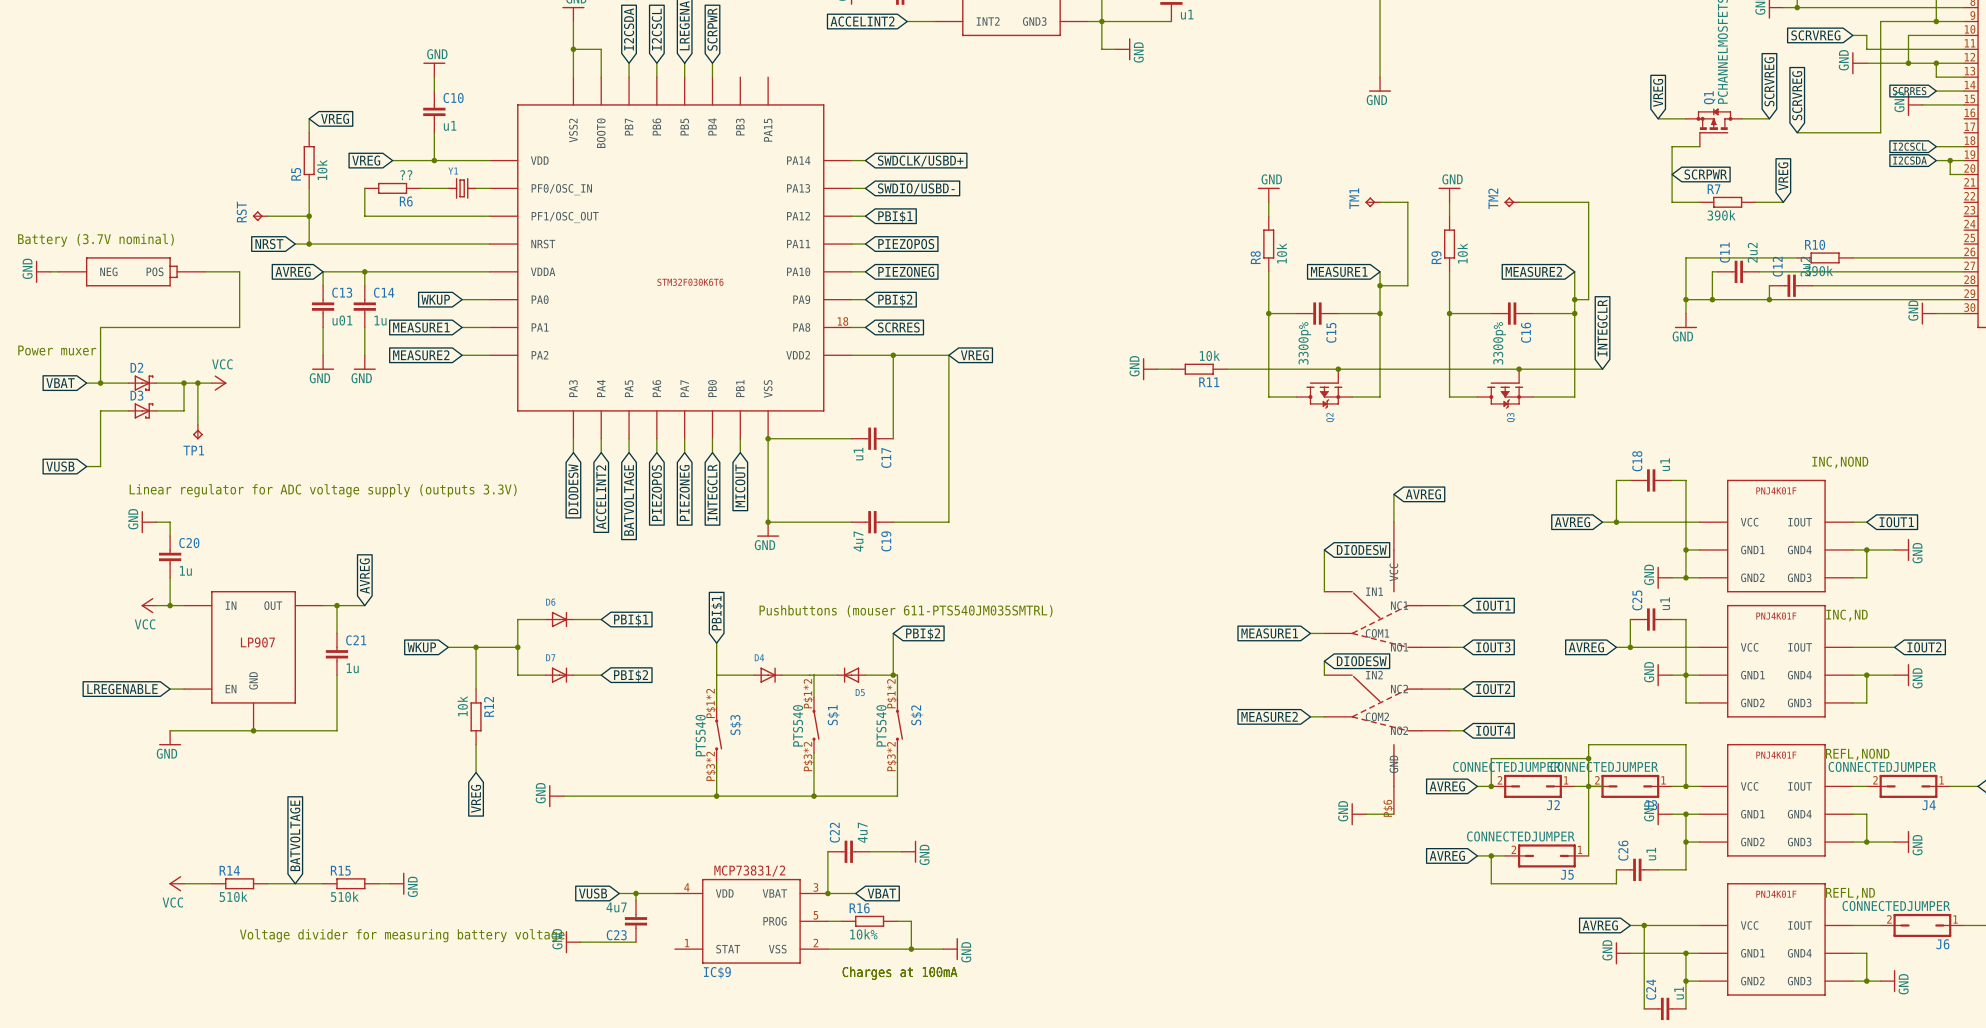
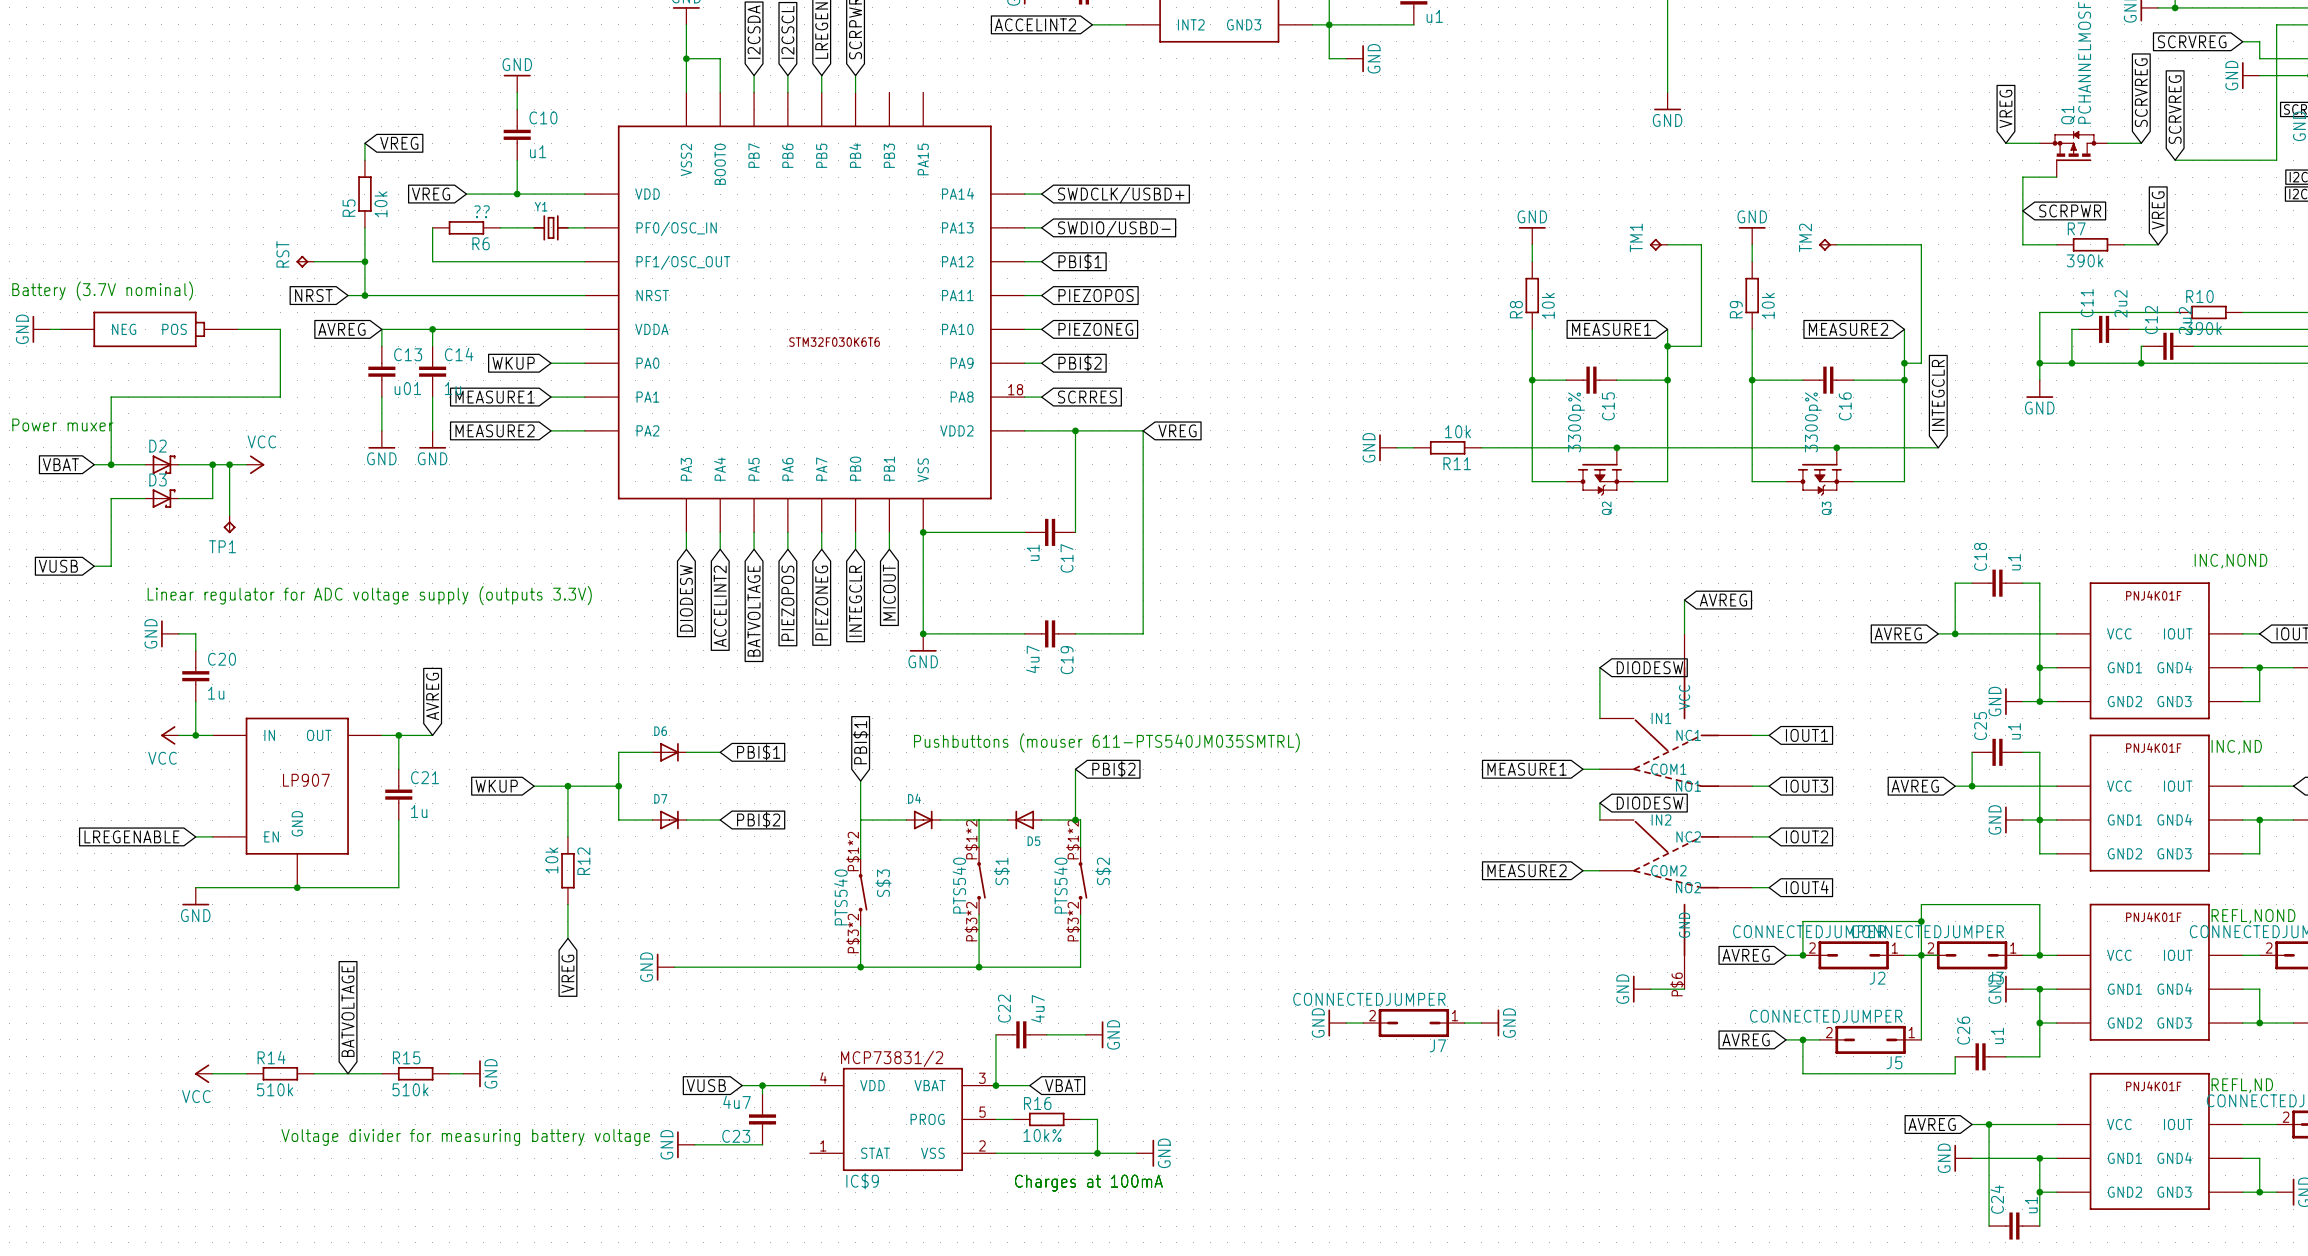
power symbol: none -> GND (1337, 1023)
wire: none -> (1346, 1023) (1363, 1023)
J7: none -> CONNECTEDJUMPER (1413, 1023)
wire: none -> (1464, 1023) (1481, 1023)
power symbol: none -> GND (1490, 1023)

